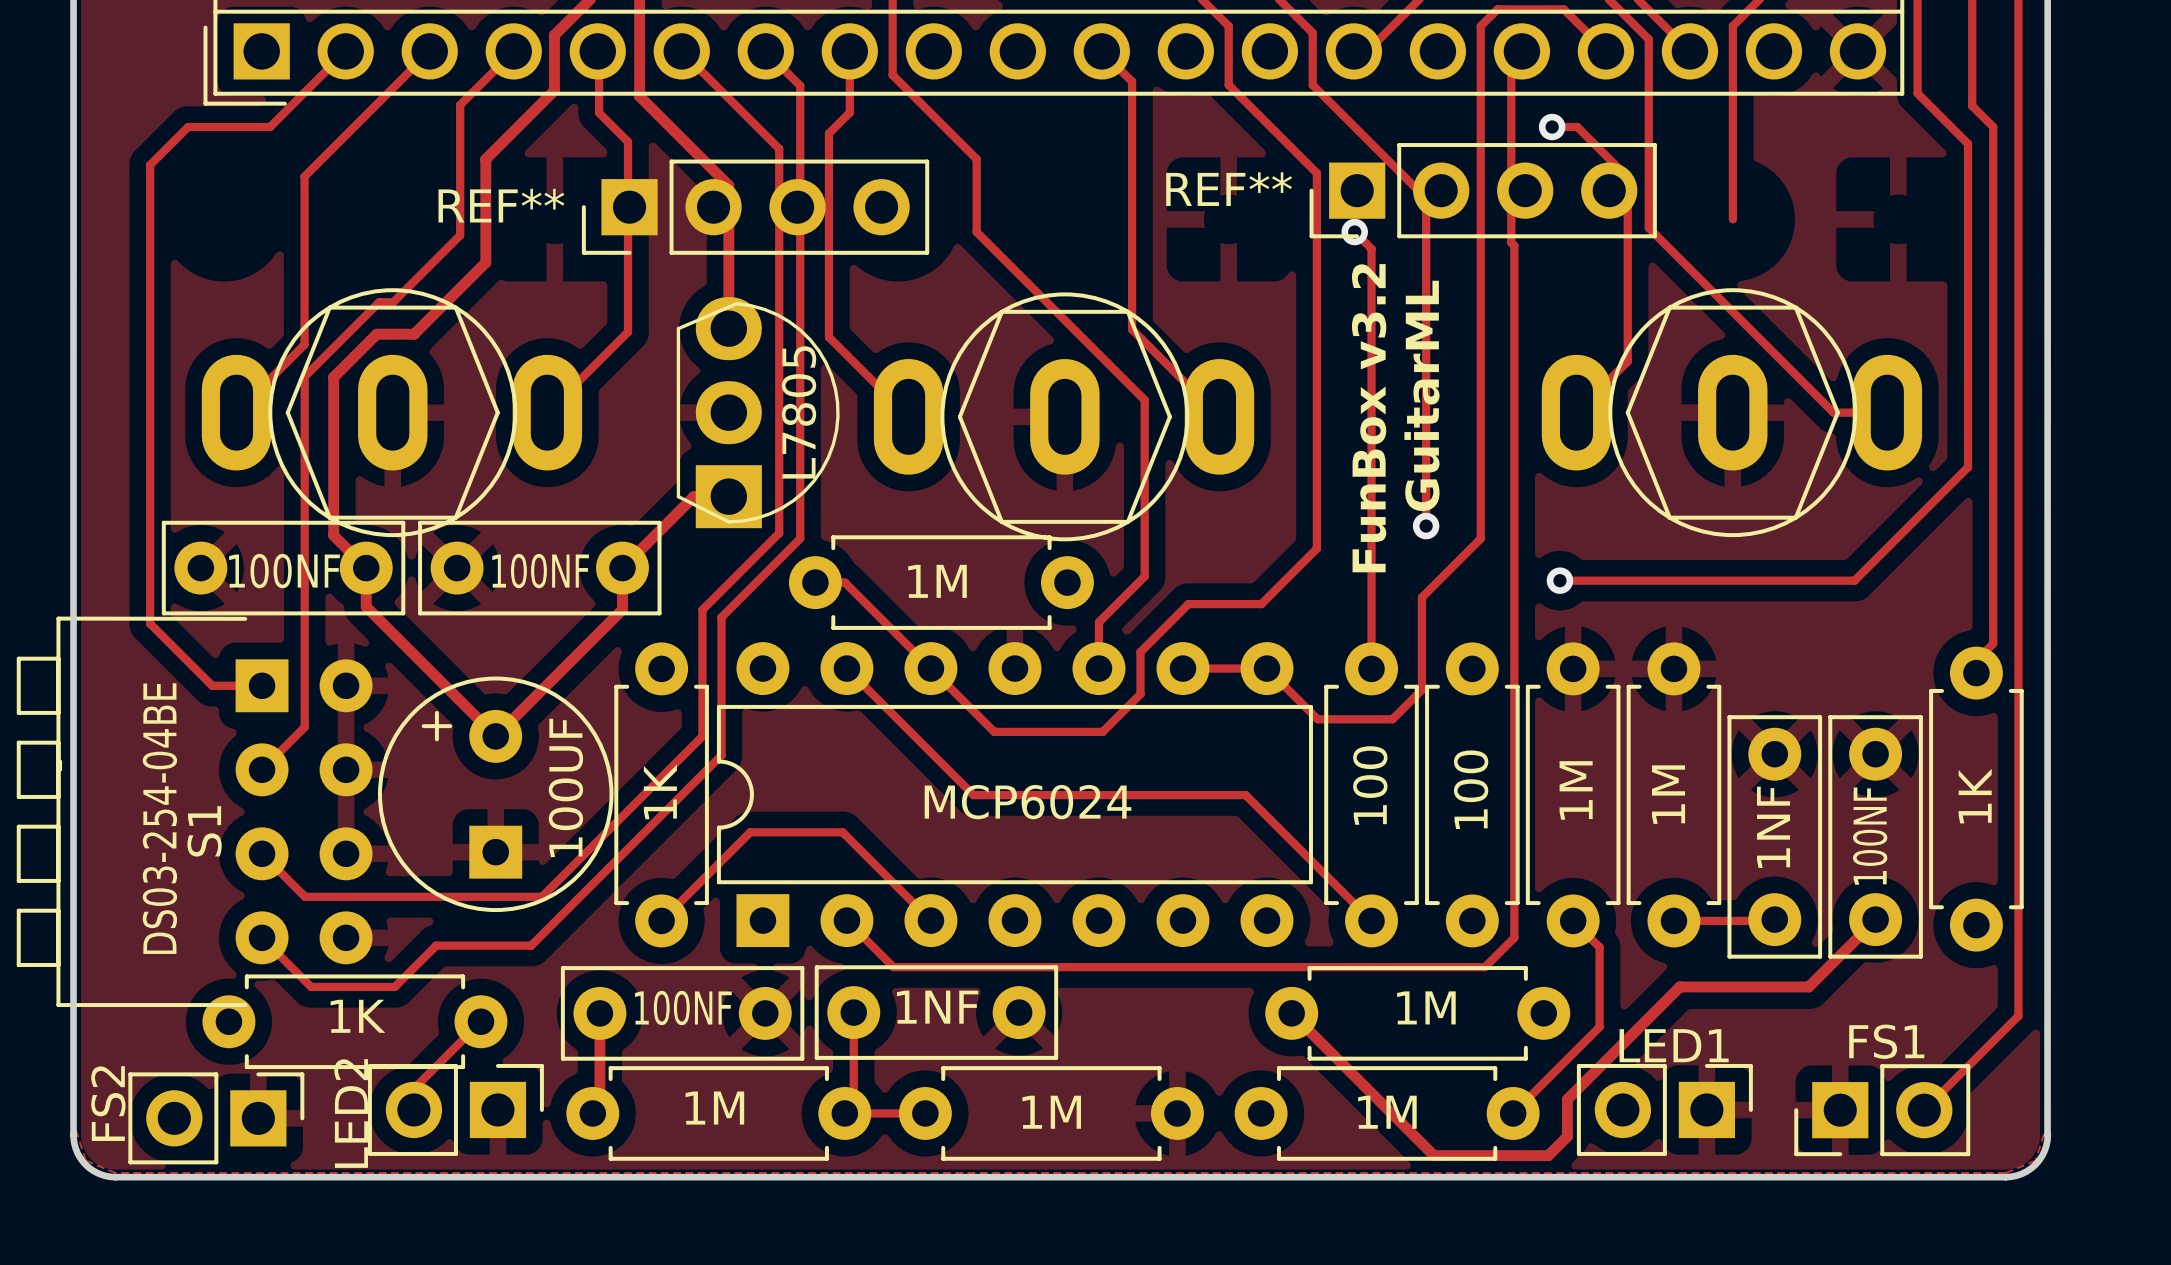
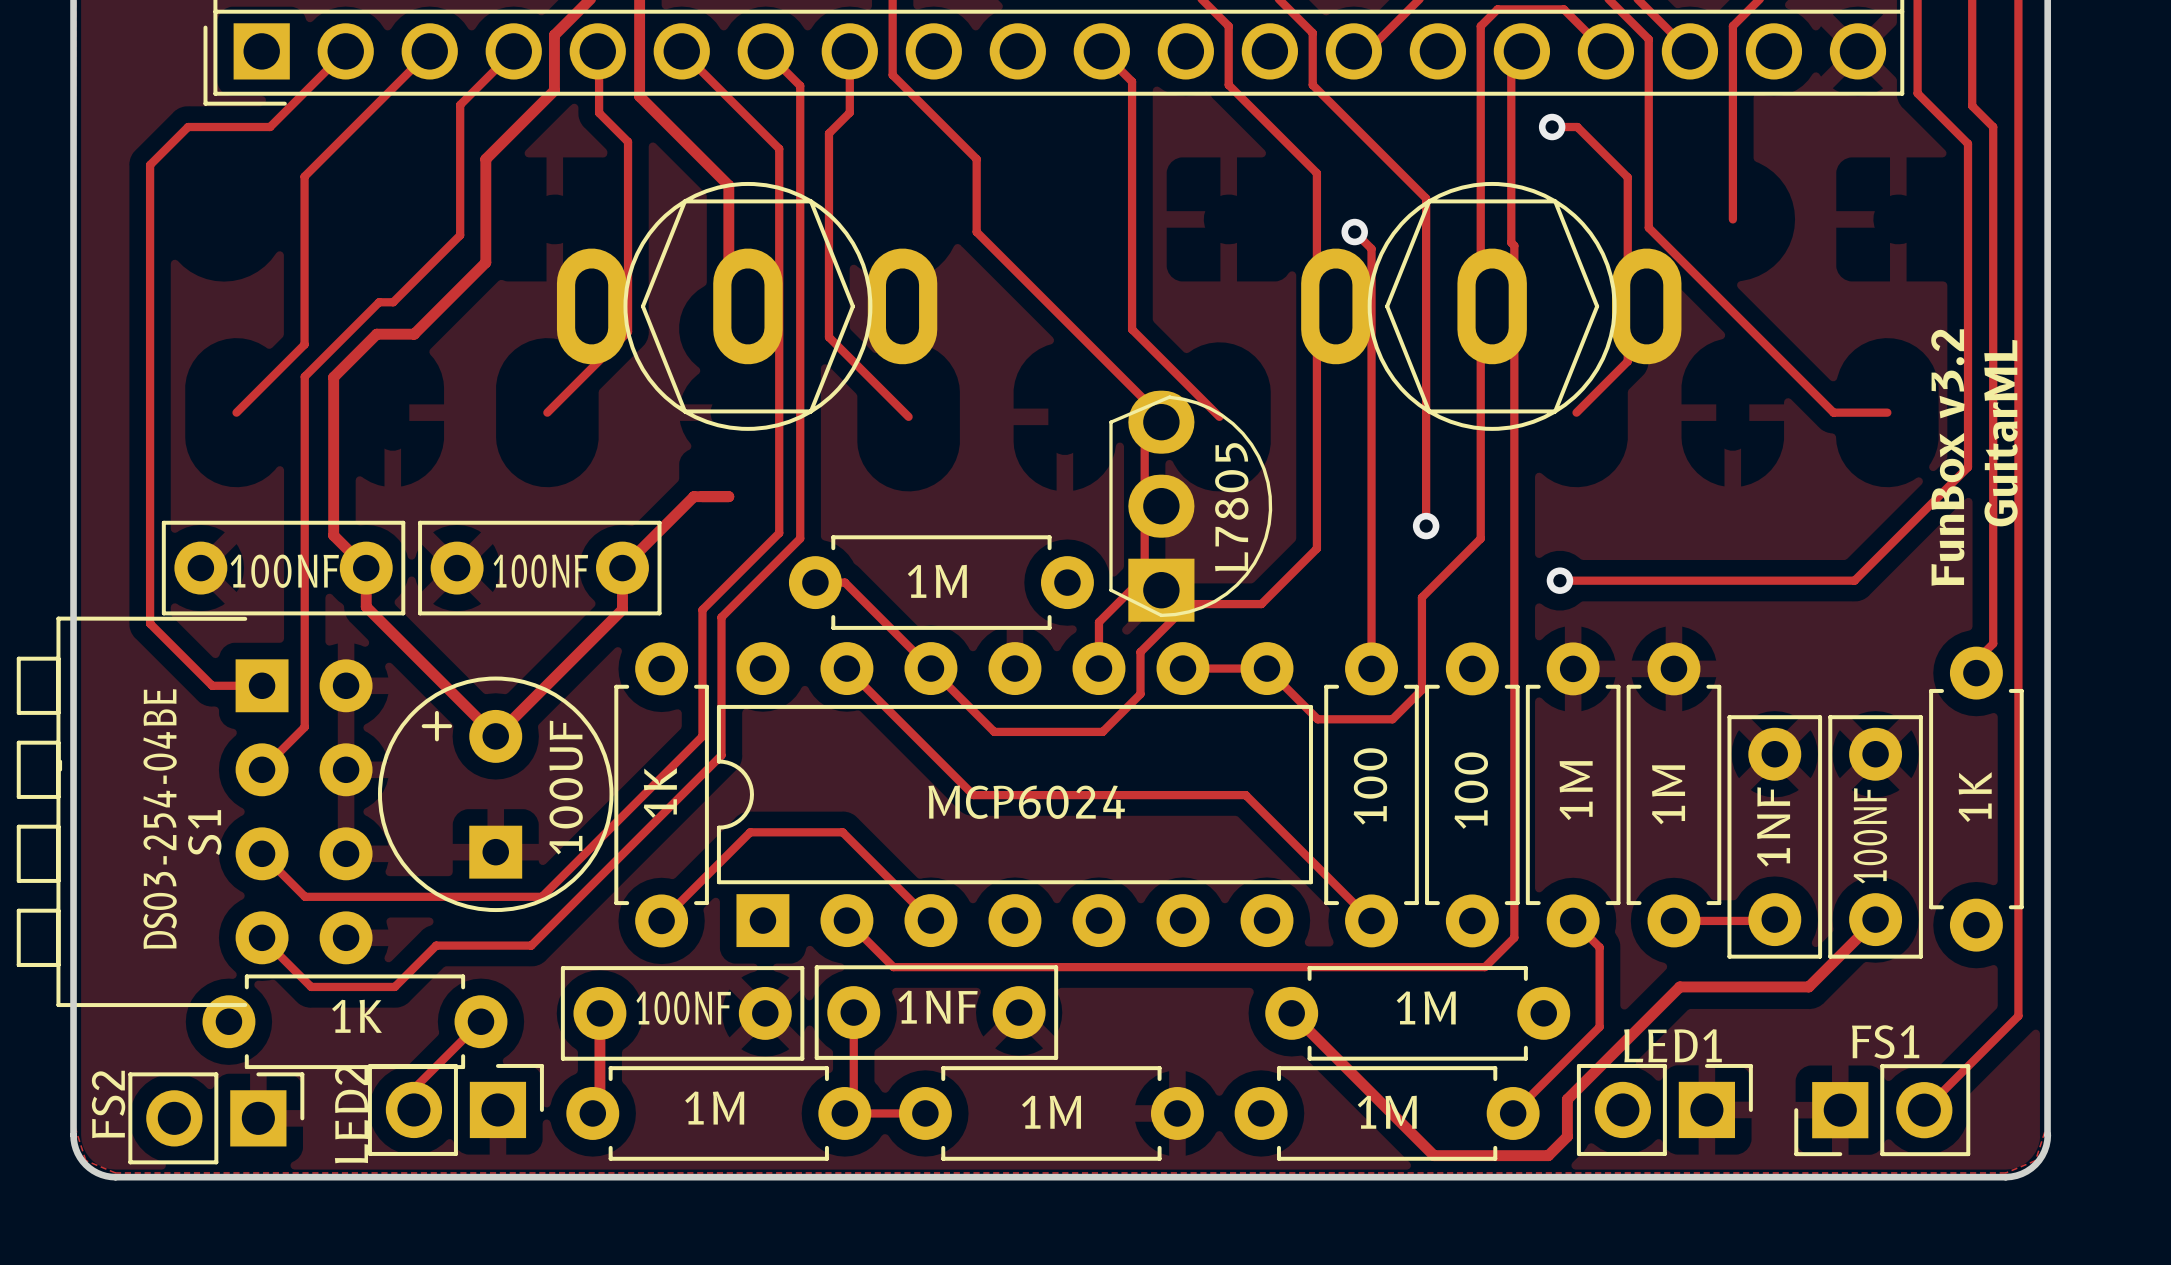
REF**: (1483, 190) -> none
REF**: (755, 207) -> none
part: none -> (747, 306)
part: none -> (1491, 306)
text position: GuitarML (1421, 395) -> GuitarML (2000, 433)
part: (391, 412) -> none
part position: (758, 412) -> (1190, 506)
part: (1731, 412) -> none
part: (1064, 416) -> none
text position: FunBox v3.2 (1369, 418) -> FunBox v3.2 (1947, 457)

